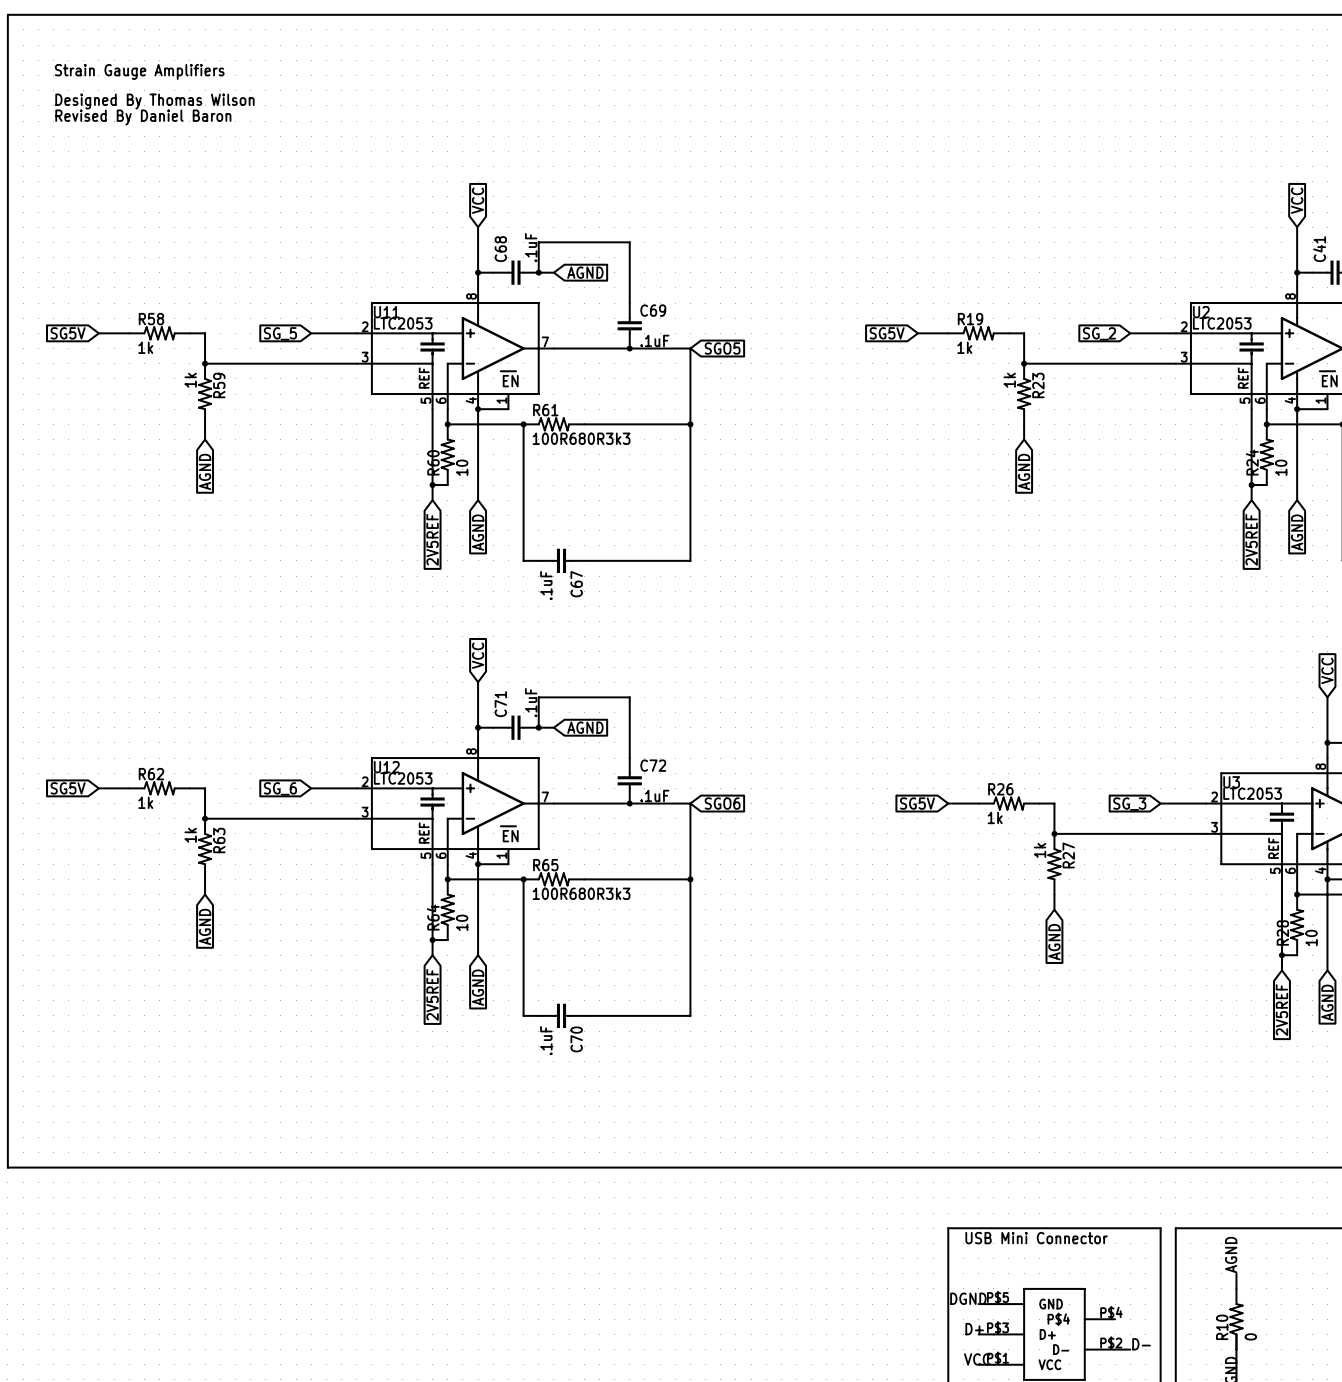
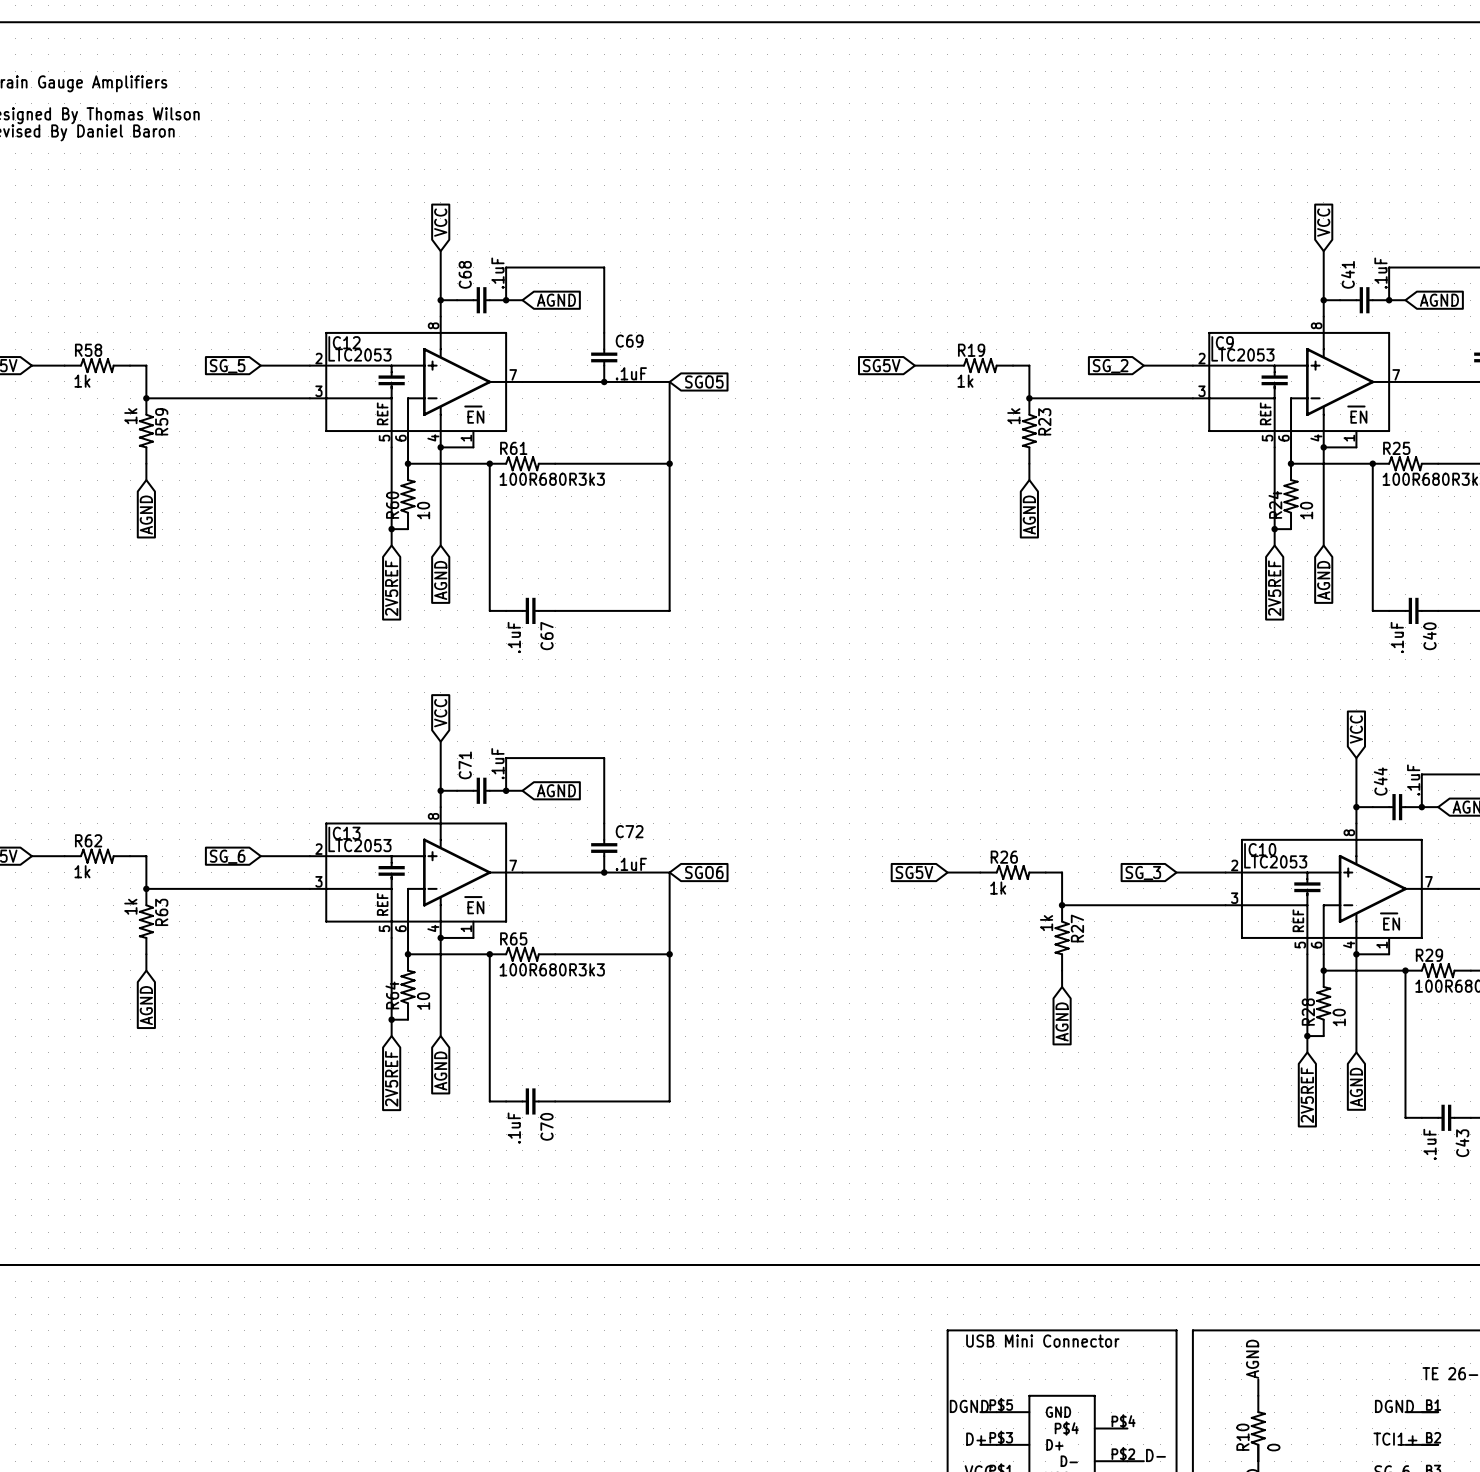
U11 name: U11 (386, 312) -> IC12 (344, 342)
U2 name: U2 (1201, 312) -> IC9 (1222, 342)
U12 name: U12 (386, 767) -> IC13 (344, 833)
U3 name: U3 (1231, 782) -> IC10 (1260, 849)

